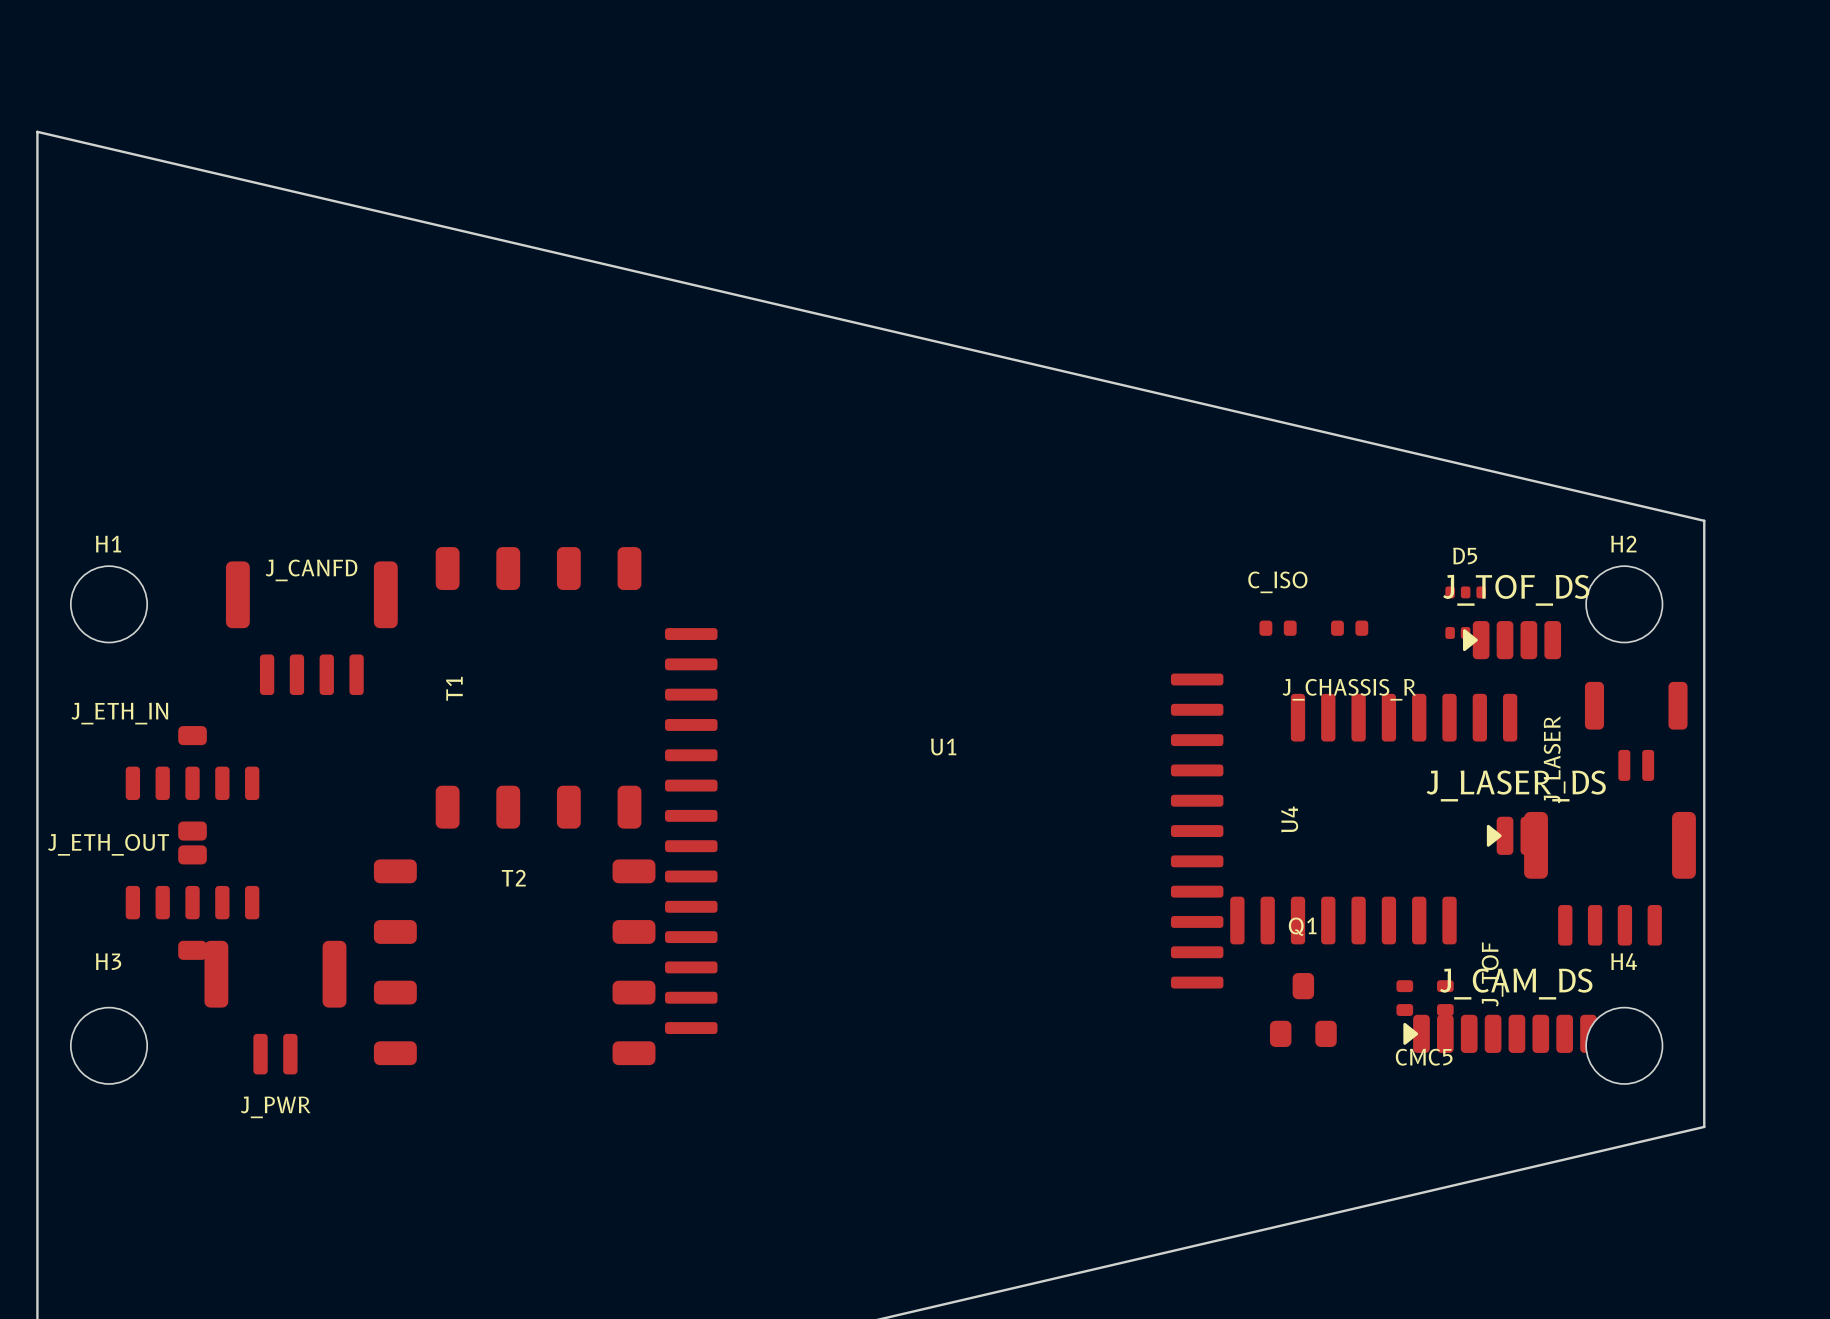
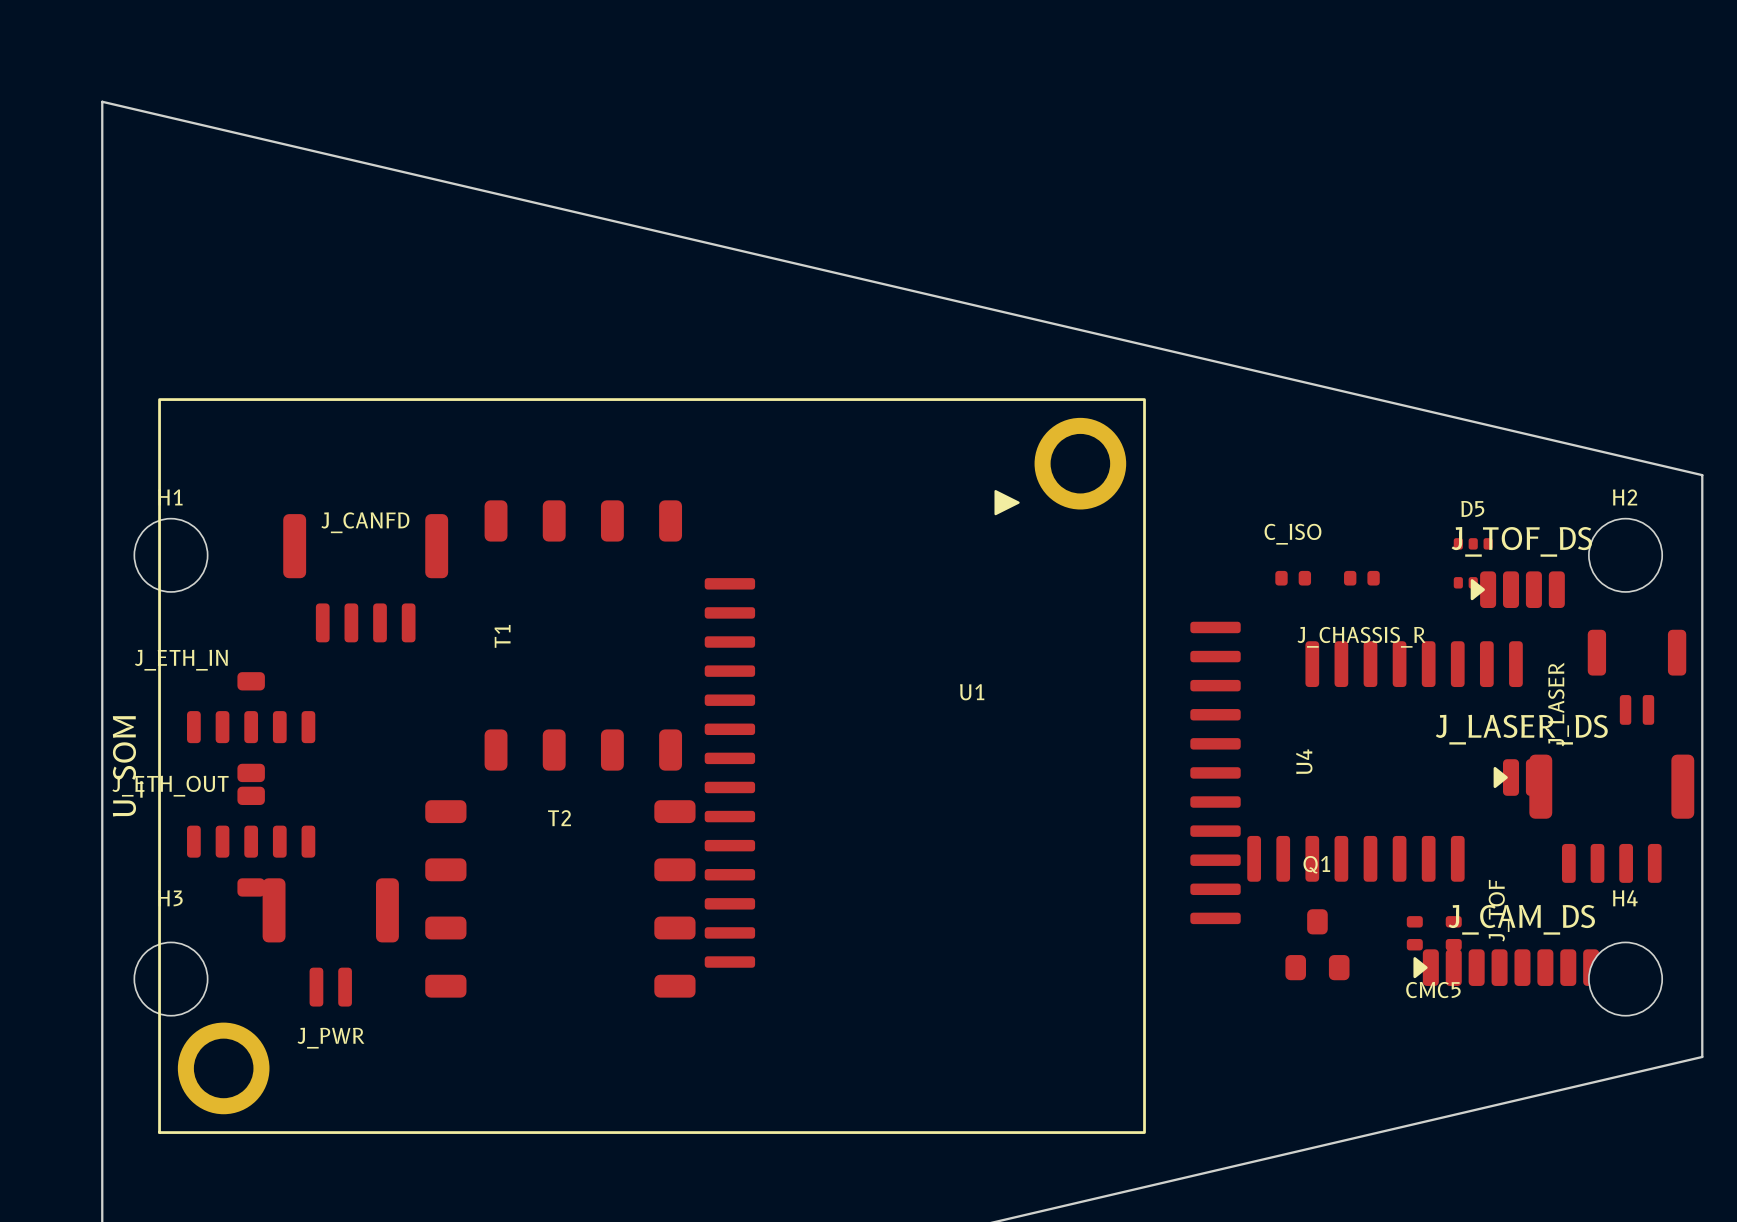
U_SOM: none -> (652, 766)

